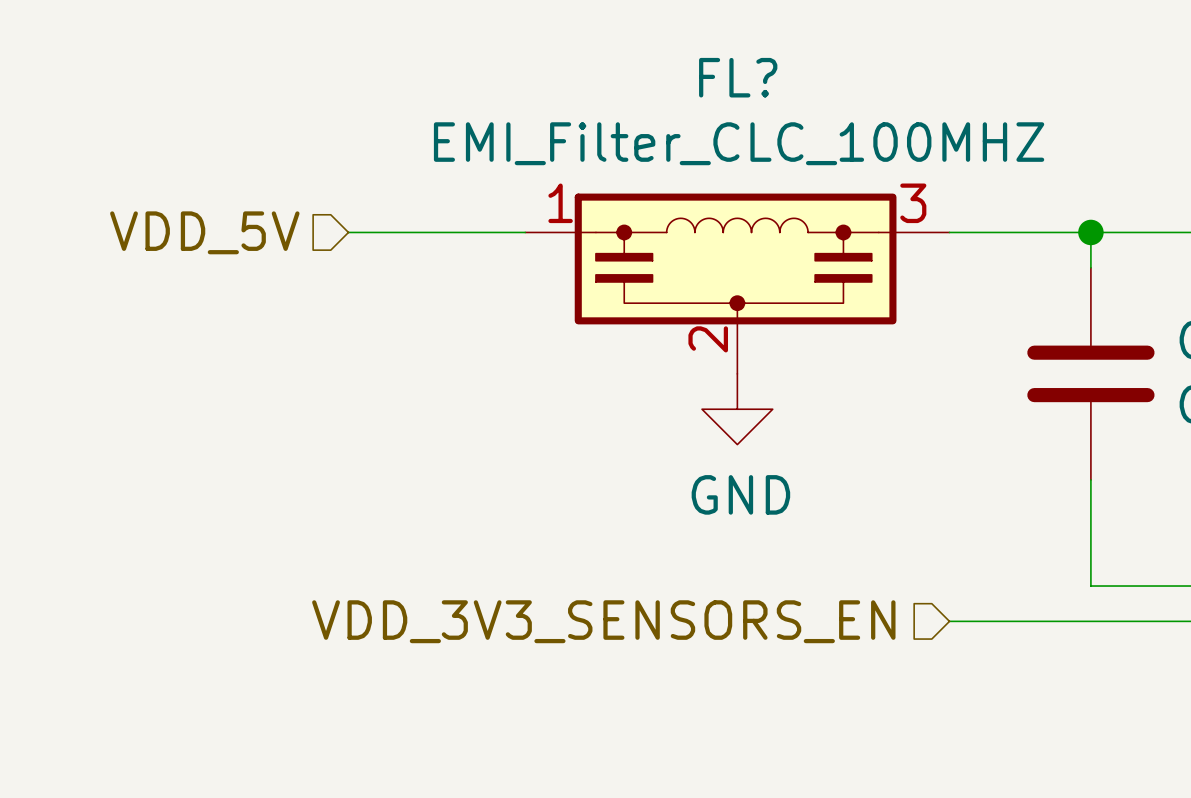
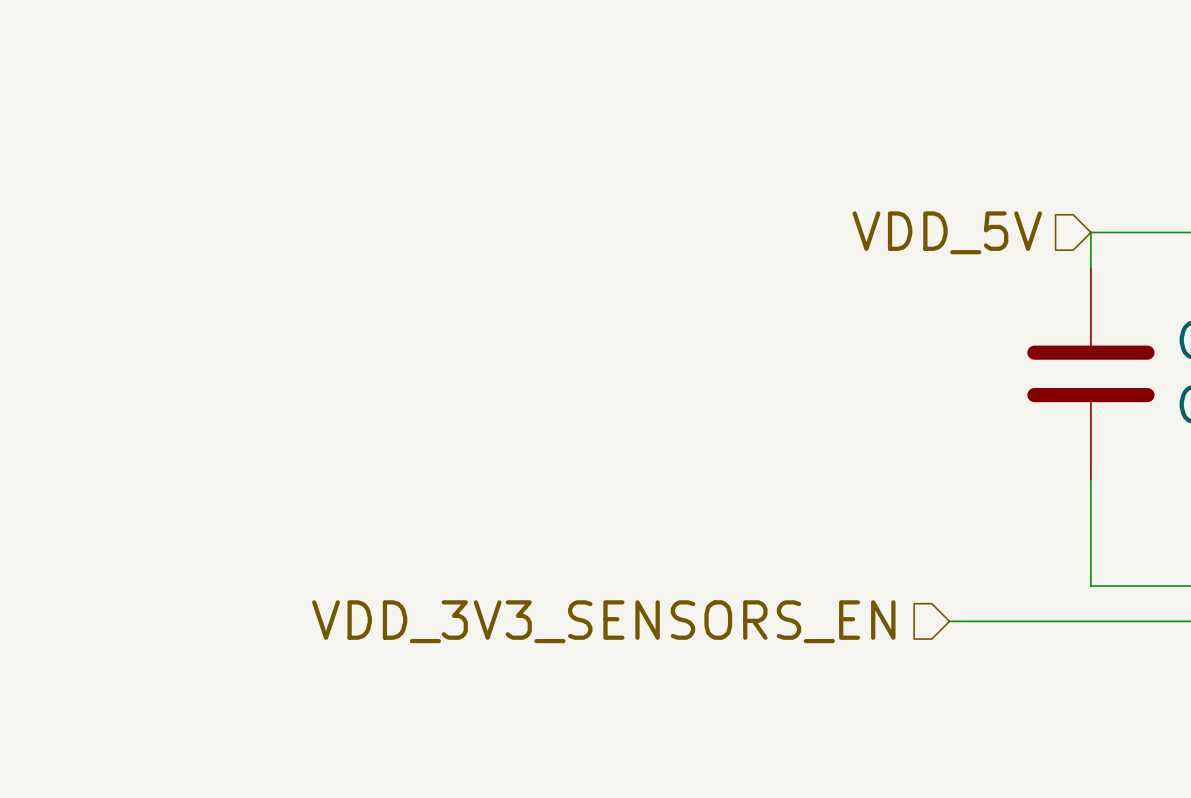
hierarchical label: VDD_5V (204, 232) -> none
wire: (348, 232) (525, 232) -> none
hierarchical label: none -> VDD_5V (947, 232)
wire: (949, 232) (1090, 232) -> none
junction: (1090, 232) -> none
FL?: EMI_Filter_CLC_100MHZ (737, 283) -> none
power symbol: GND (737, 409) -> none

